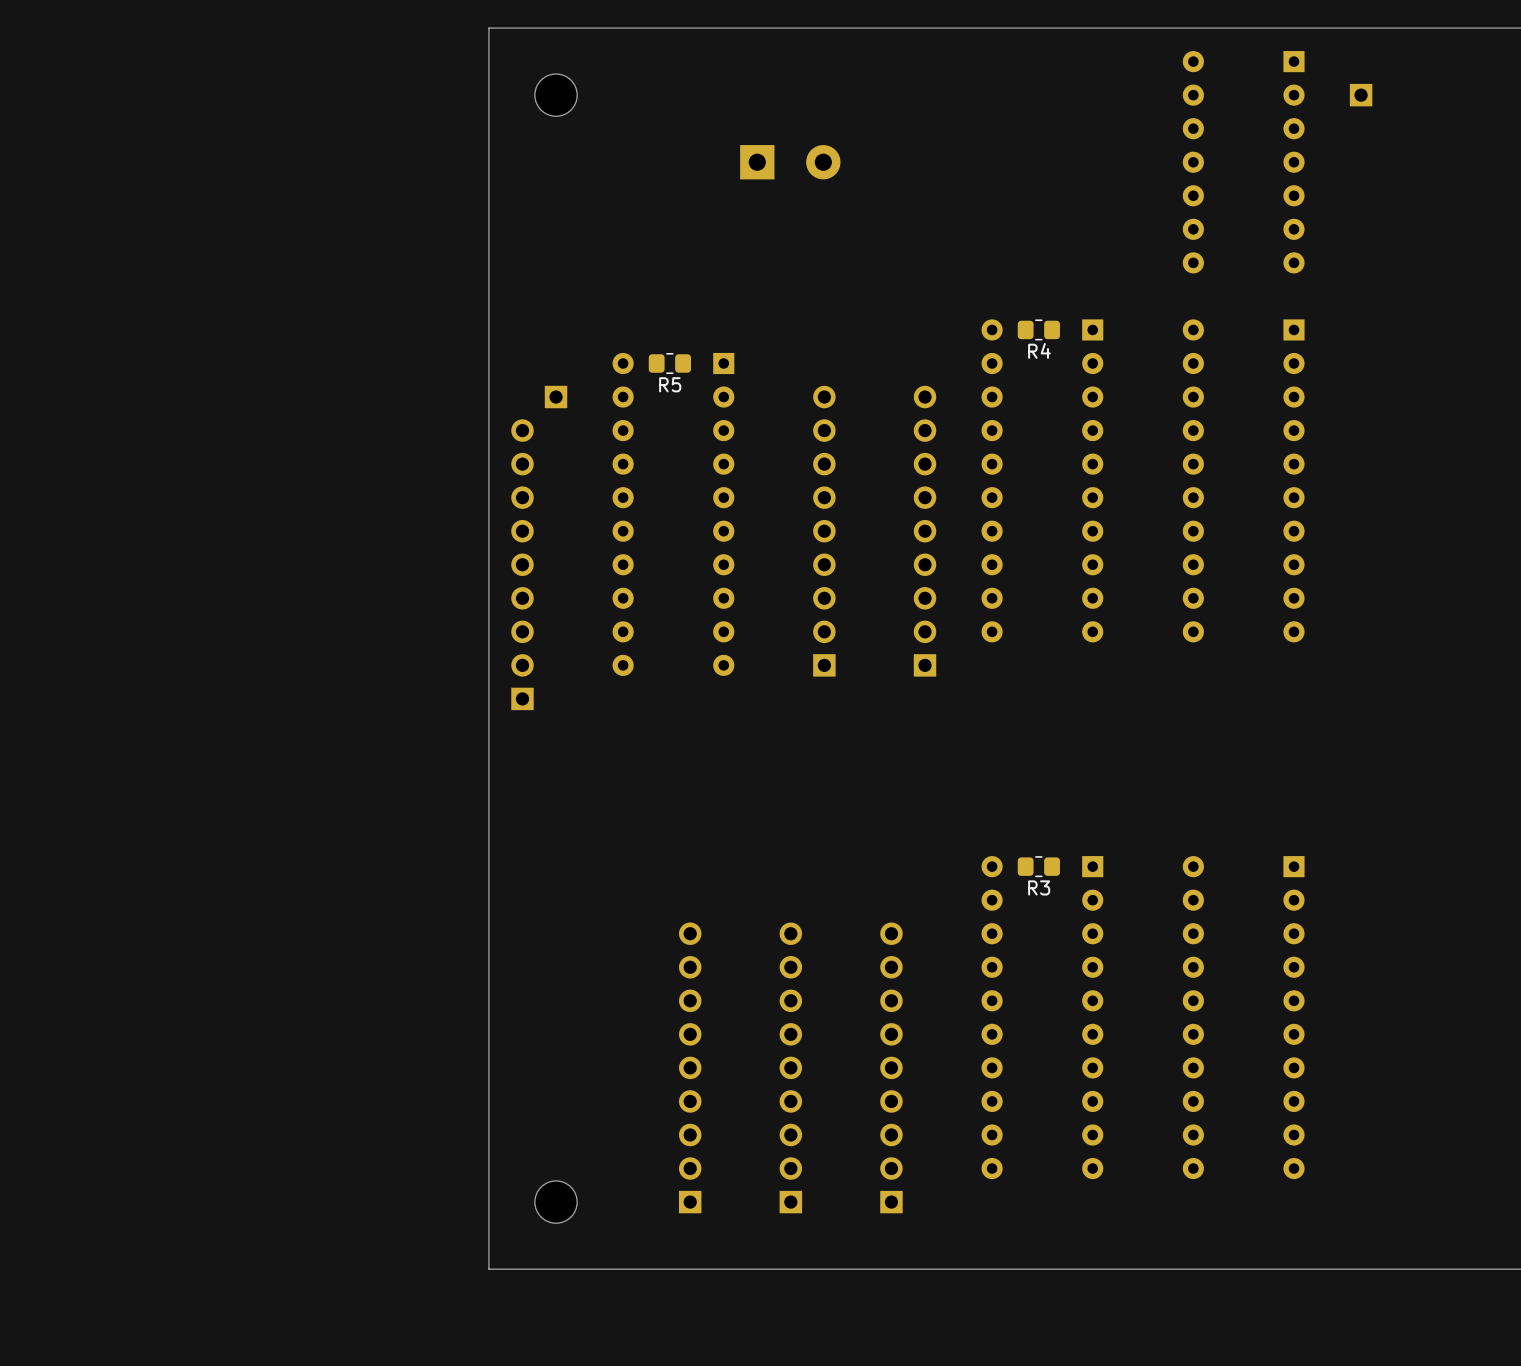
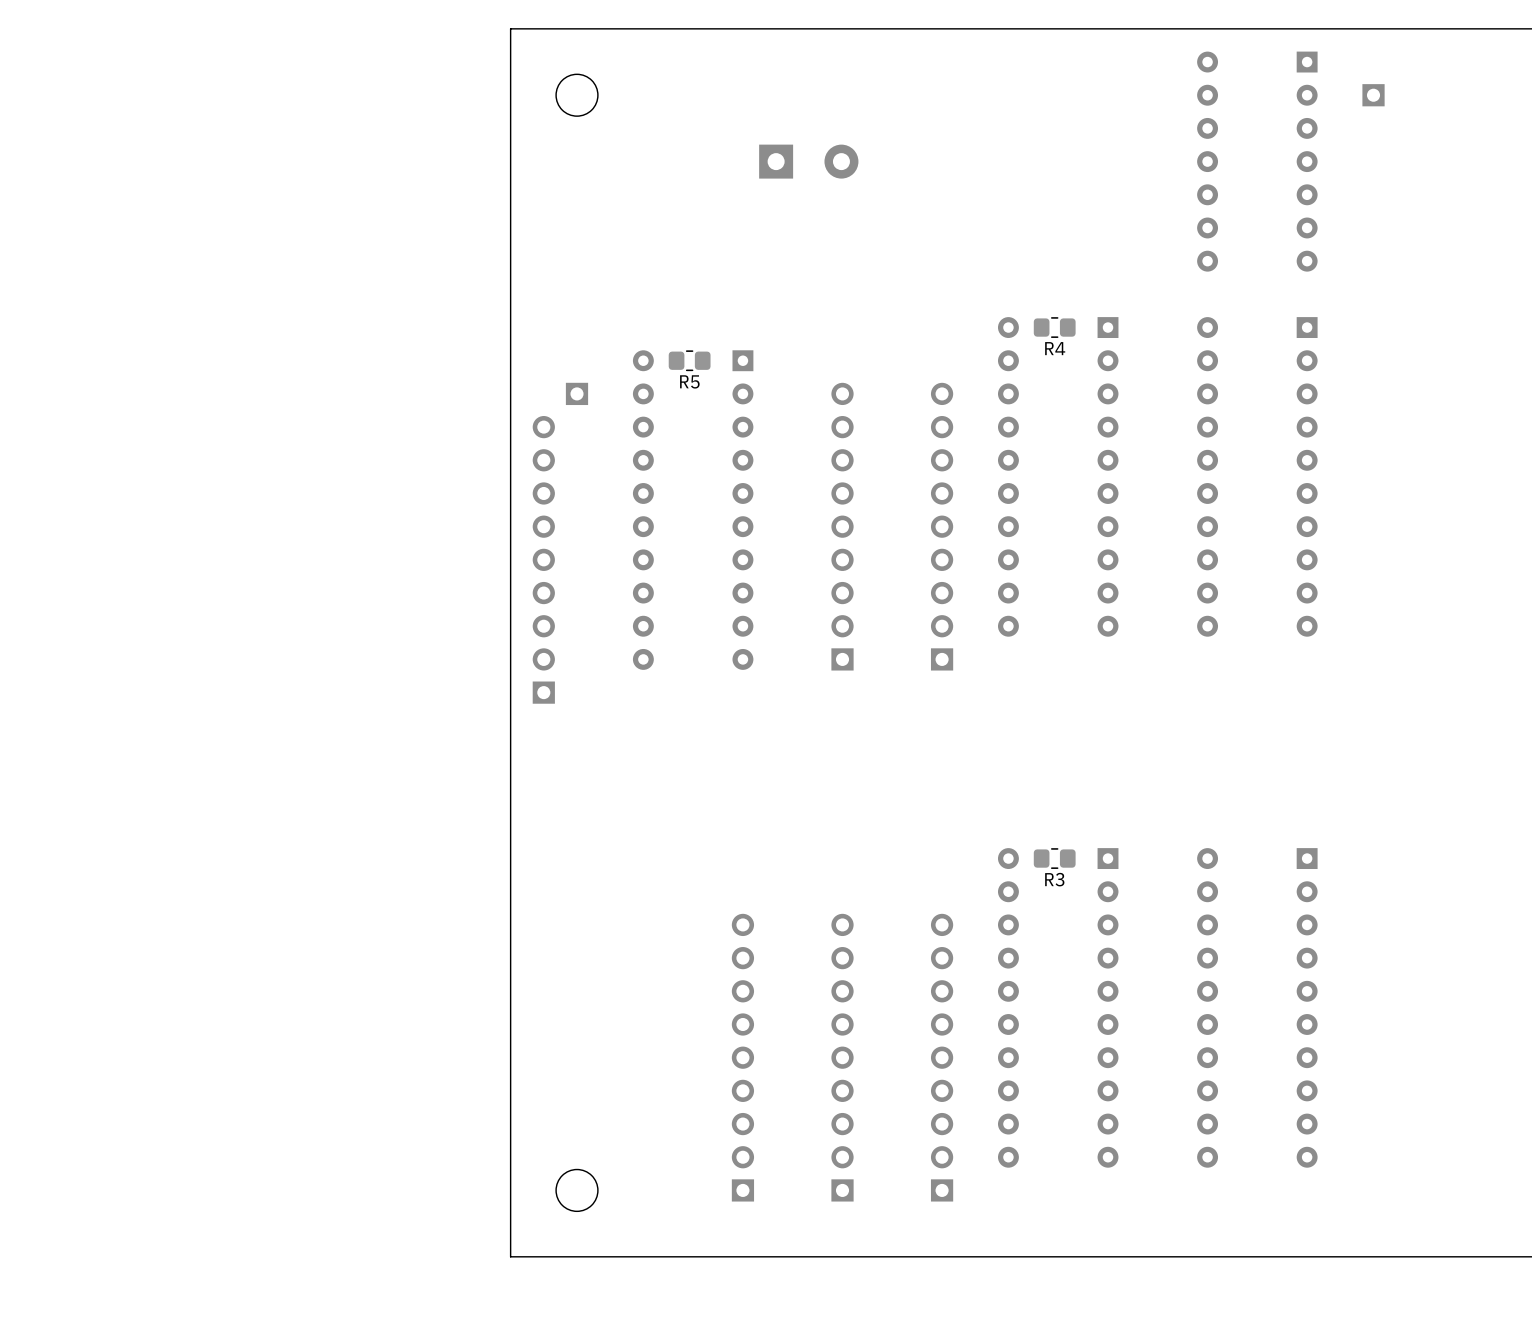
part: (690, 1067) -> none
part: none -> (742, 1057)
part: (790, 1067) -> none
part: none -> (842, 1057)
part: (891, 1067) -> none
part: none -> (942, 1057)

